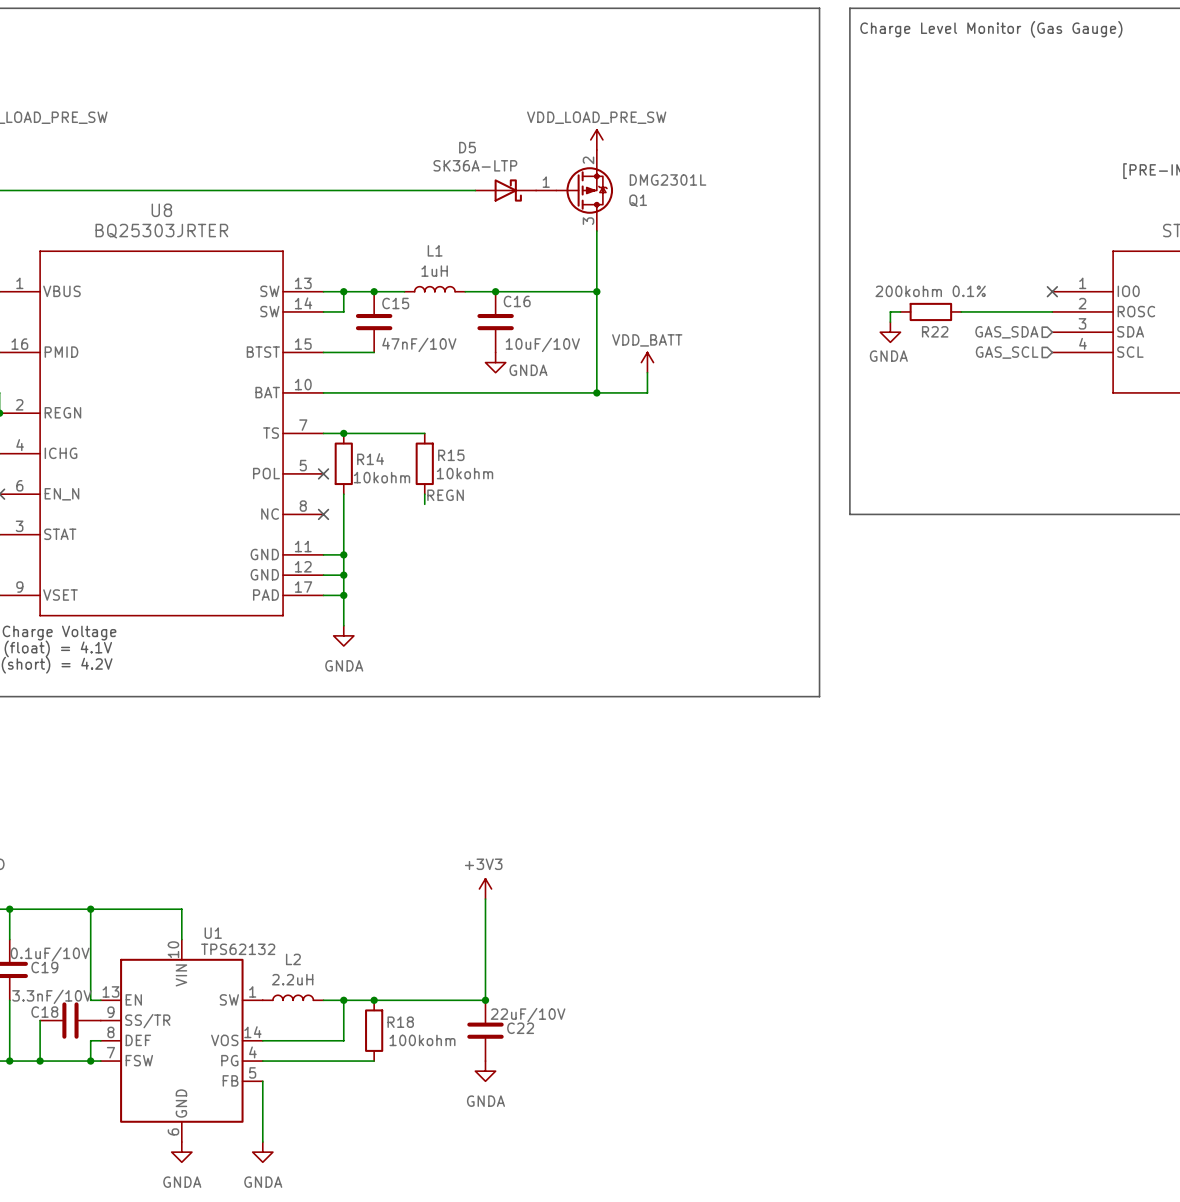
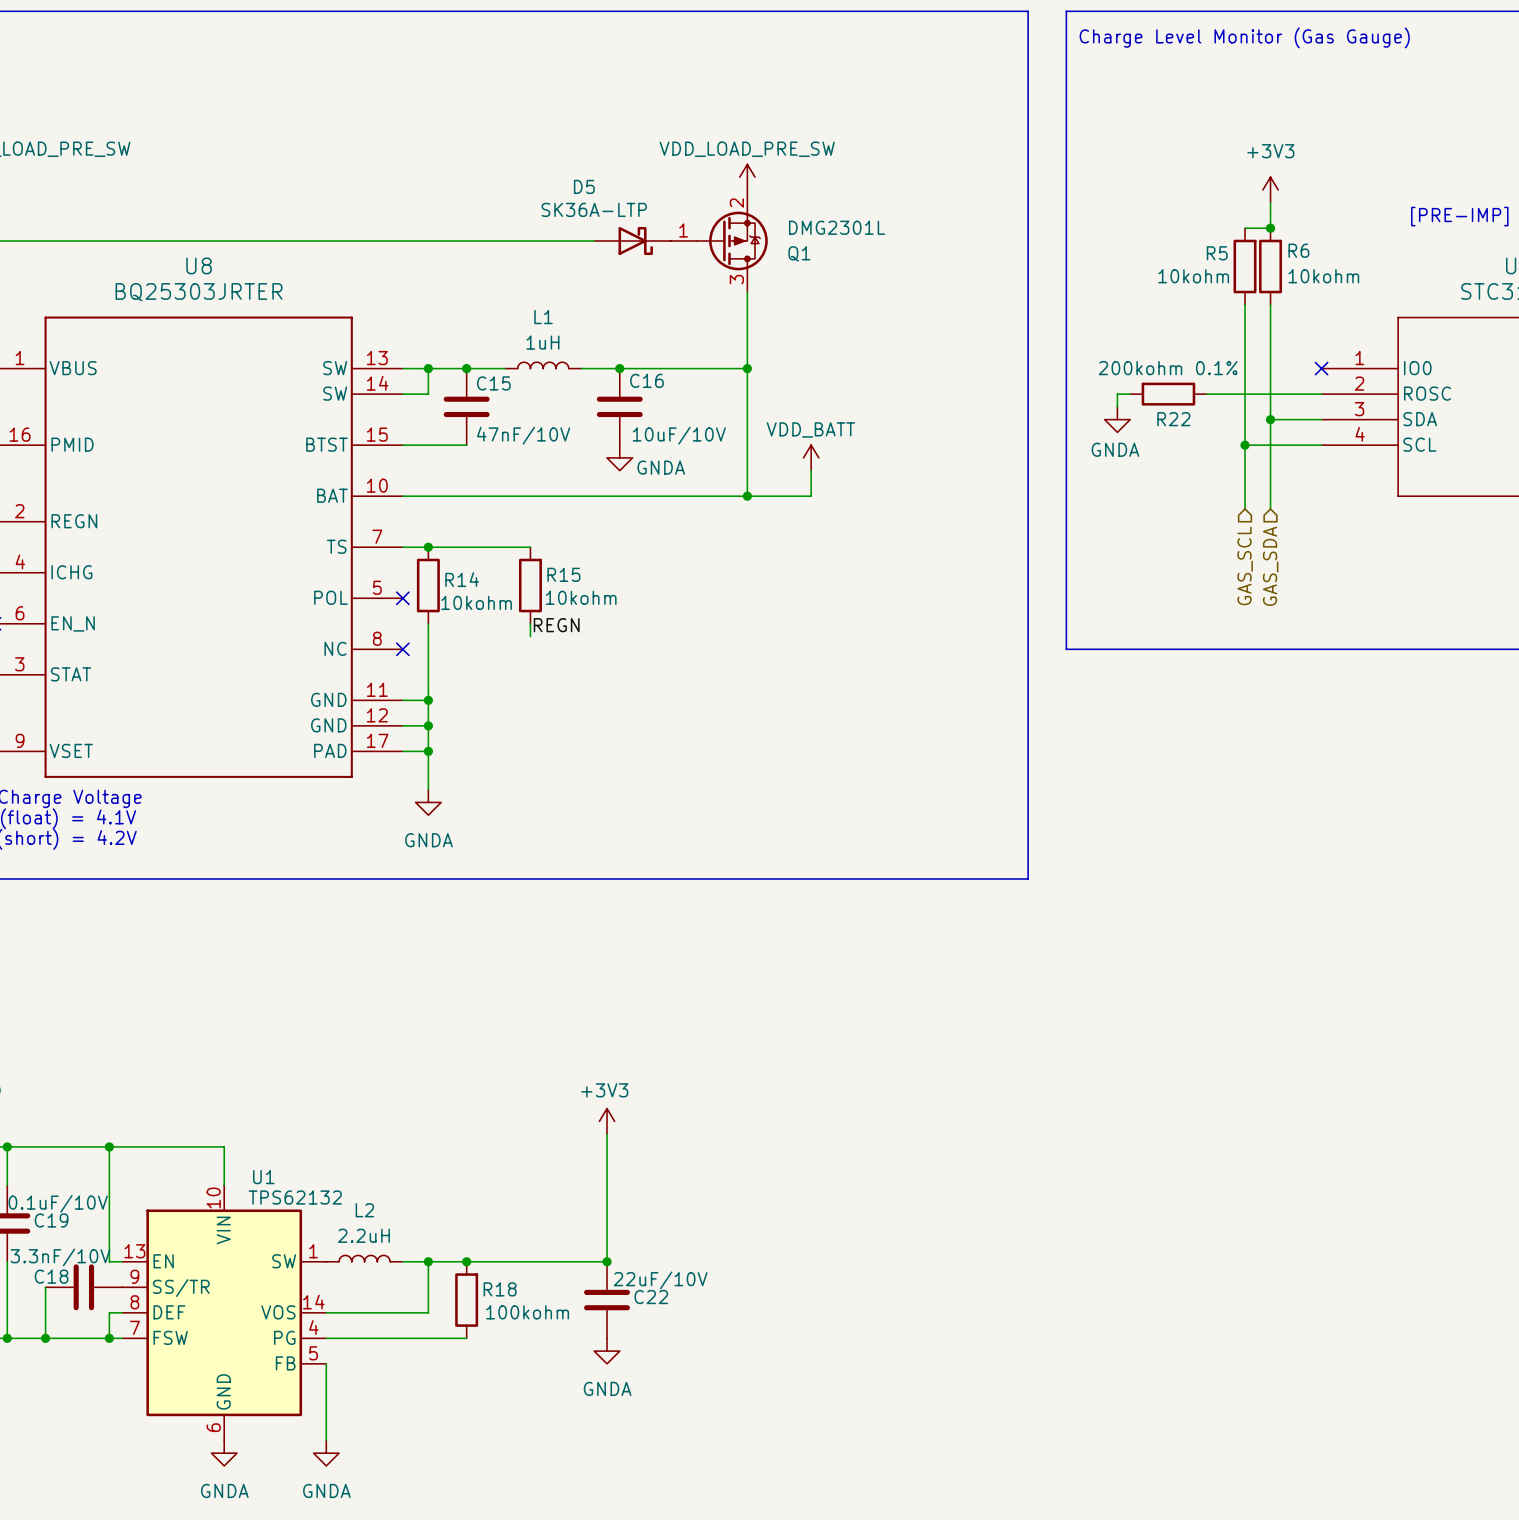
power symbol: none -> +3V3 (1270, 189)
wire: none -> (1270, 202) (1270, 228) (1245, 228)
junction: none -> (1270, 228)
R5: none -> 10kohm (1245, 266)
R6: none -> 10kohm (1270, 266)
wire: none -> (1245, 304) (1245, 508)
wire: none -> (1270, 304) (1270, 508)
hierarchical label rotation: 0° (1006, 332) -> 90° counterclockwise (1270, 566)
hierarchical label position: GAS_SDA (1006, 332) -> GAS_SDA (1270, 566)
wire: none -> (1270, 419) (1321, 419)
junction: none -> (1270, 419)
wire: none -> (1245, 445) (1321, 445)
junction: none -> (1245, 445)
hierarchical label rotation: 0° (1007, 352) -> 90° counterclockwise (1245, 565)
hierarchical label position: GAS_SCL (1007, 352) -> GAS_SCL (1245, 565)

